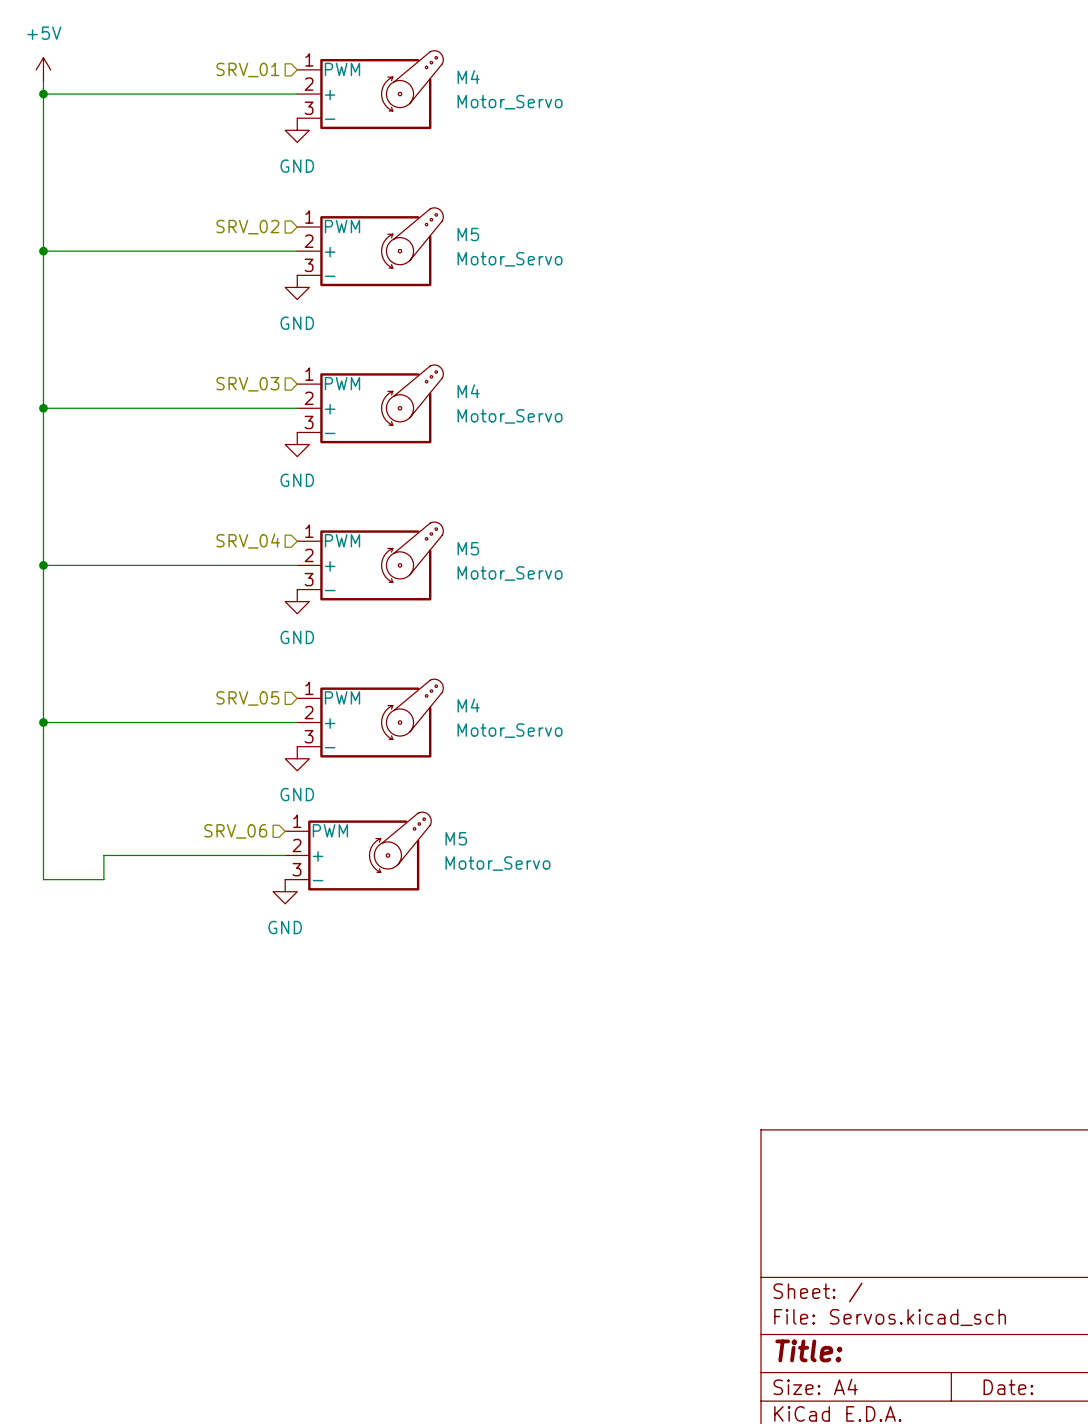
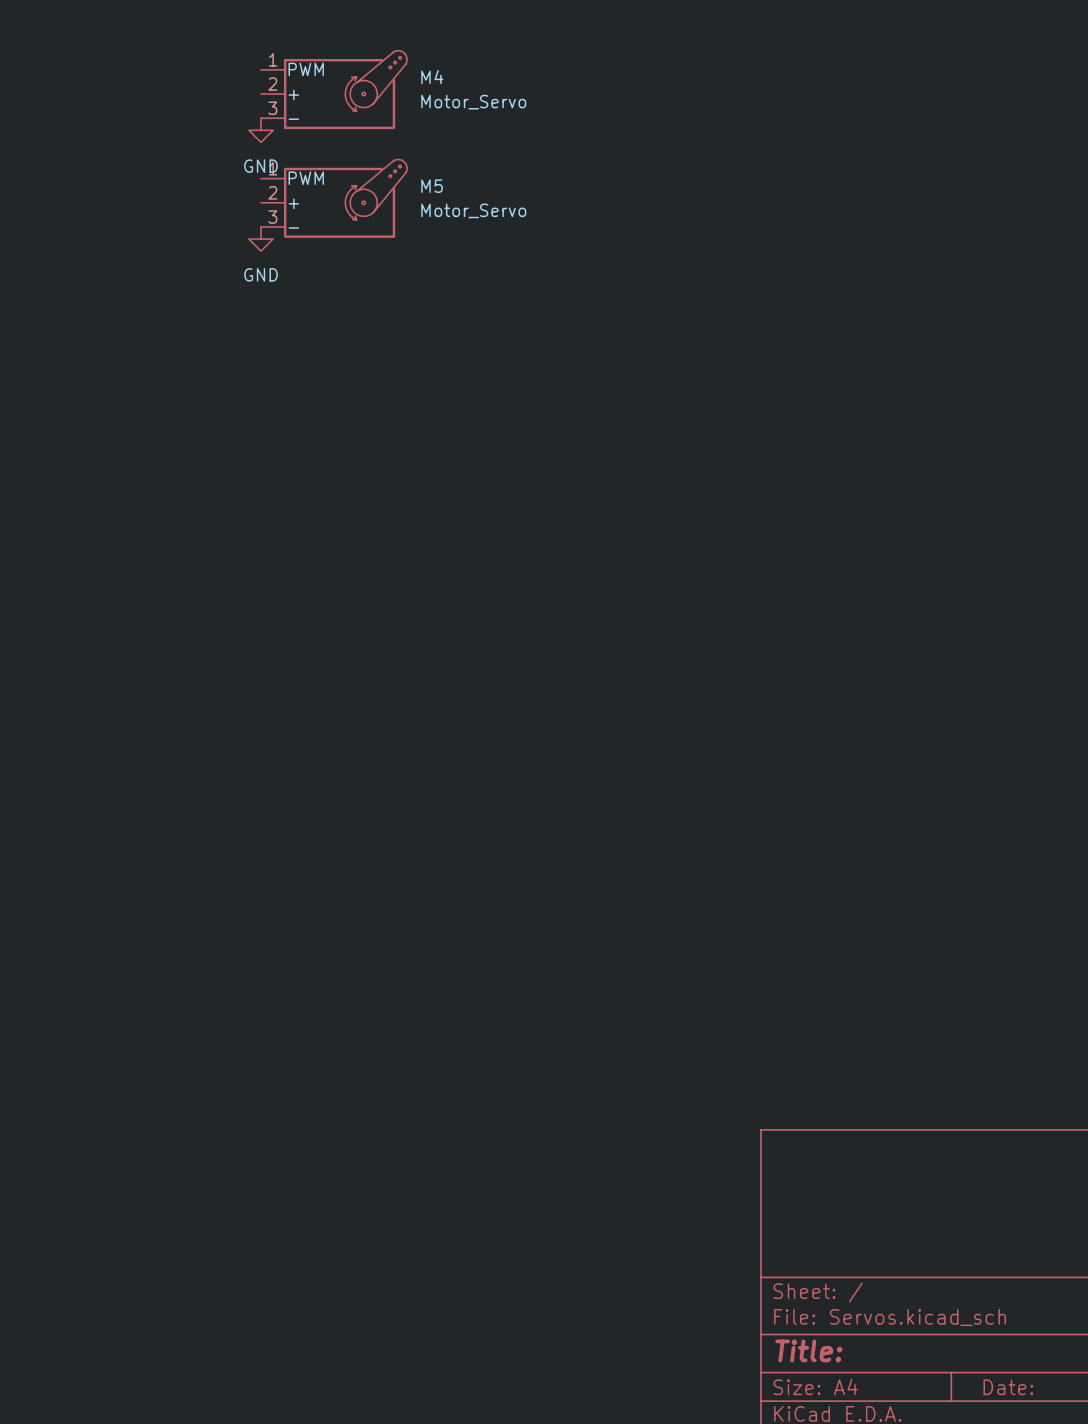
power symbol: +5V (43, 69) -> none
hierarchical label: SRV_01 (247, 70) -> none
wire: (43, 81) (43, 879) (103, 879) (103, 855) (285, 855) -> none
M4 position: (370, 89) -> (334, 89)
wire: (43, 94) (297, 94) -> none
junction: (43, 94) -> none
power symbol position: GND (297, 130) -> GND (261, 130)
hierarchical label: SRV_02 (247, 227) -> none
power symbol: none -> GND (261, 239)
M5 position: (370, 247) -> (334, 198)
wire: (43, 251) (297, 251) -> none
junction: (43, 251) -> none
power symbol: GND (297, 287) -> none
hierarchical label: SRV_03 (247, 384) -> none
M4: Motor_Servo (370, 404) -> none
wire: (43, 408) (297, 408) -> none
junction: (43, 408) -> none
power symbol: GND (297, 444) -> none
hierarchical label: SRV_04 (248, 541) -> none
M5: Motor_Servo (370, 561) -> none
wire: (43, 565) (297, 565) -> none
junction: (43, 565) -> none
power symbol: GND (297, 601) -> none
hierarchical label: SRV_05 (247, 698) -> none
M4: Motor_Servo (370, 718) -> none
wire: (43, 722) (297, 722) -> none
junction: (43, 722) -> none
power symbol: GND (297, 758) -> none
hierarchical label: SRV_06 (235, 831) -> none
M5: Motor_Servo (358, 851) -> none
power symbol: GND (285, 891) -> none

